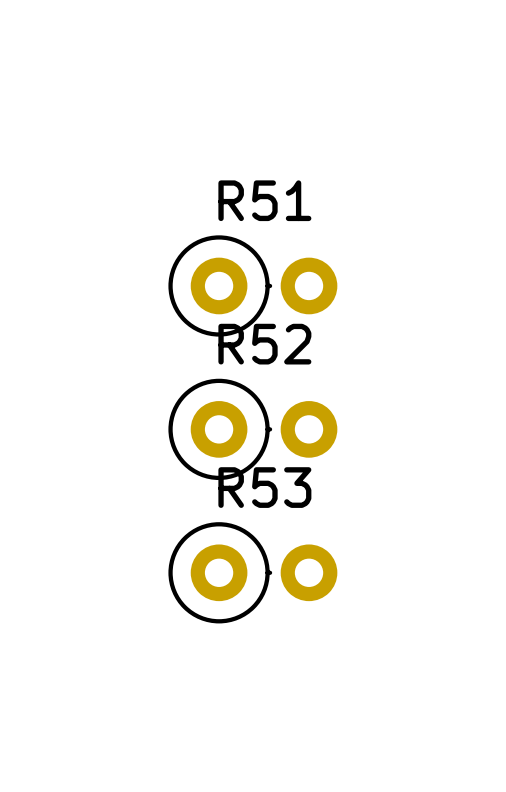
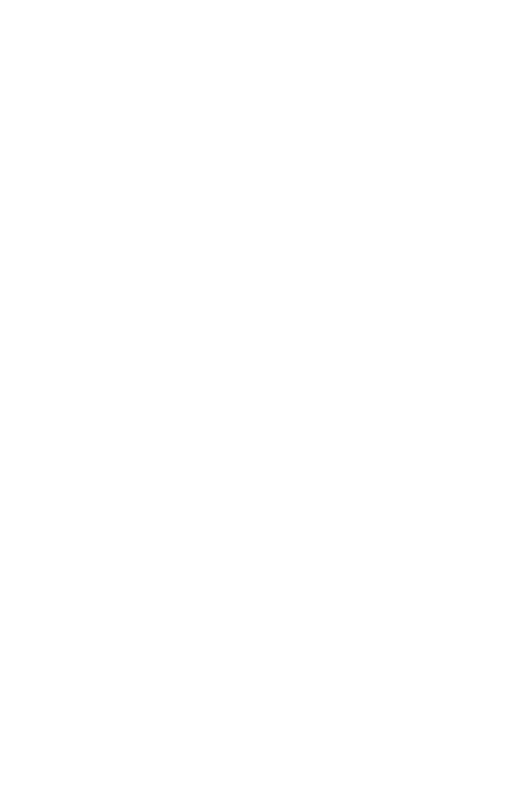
R51: (252, 285) -> none
R52: (252, 429) -> none
R53: (252, 572) -> none

